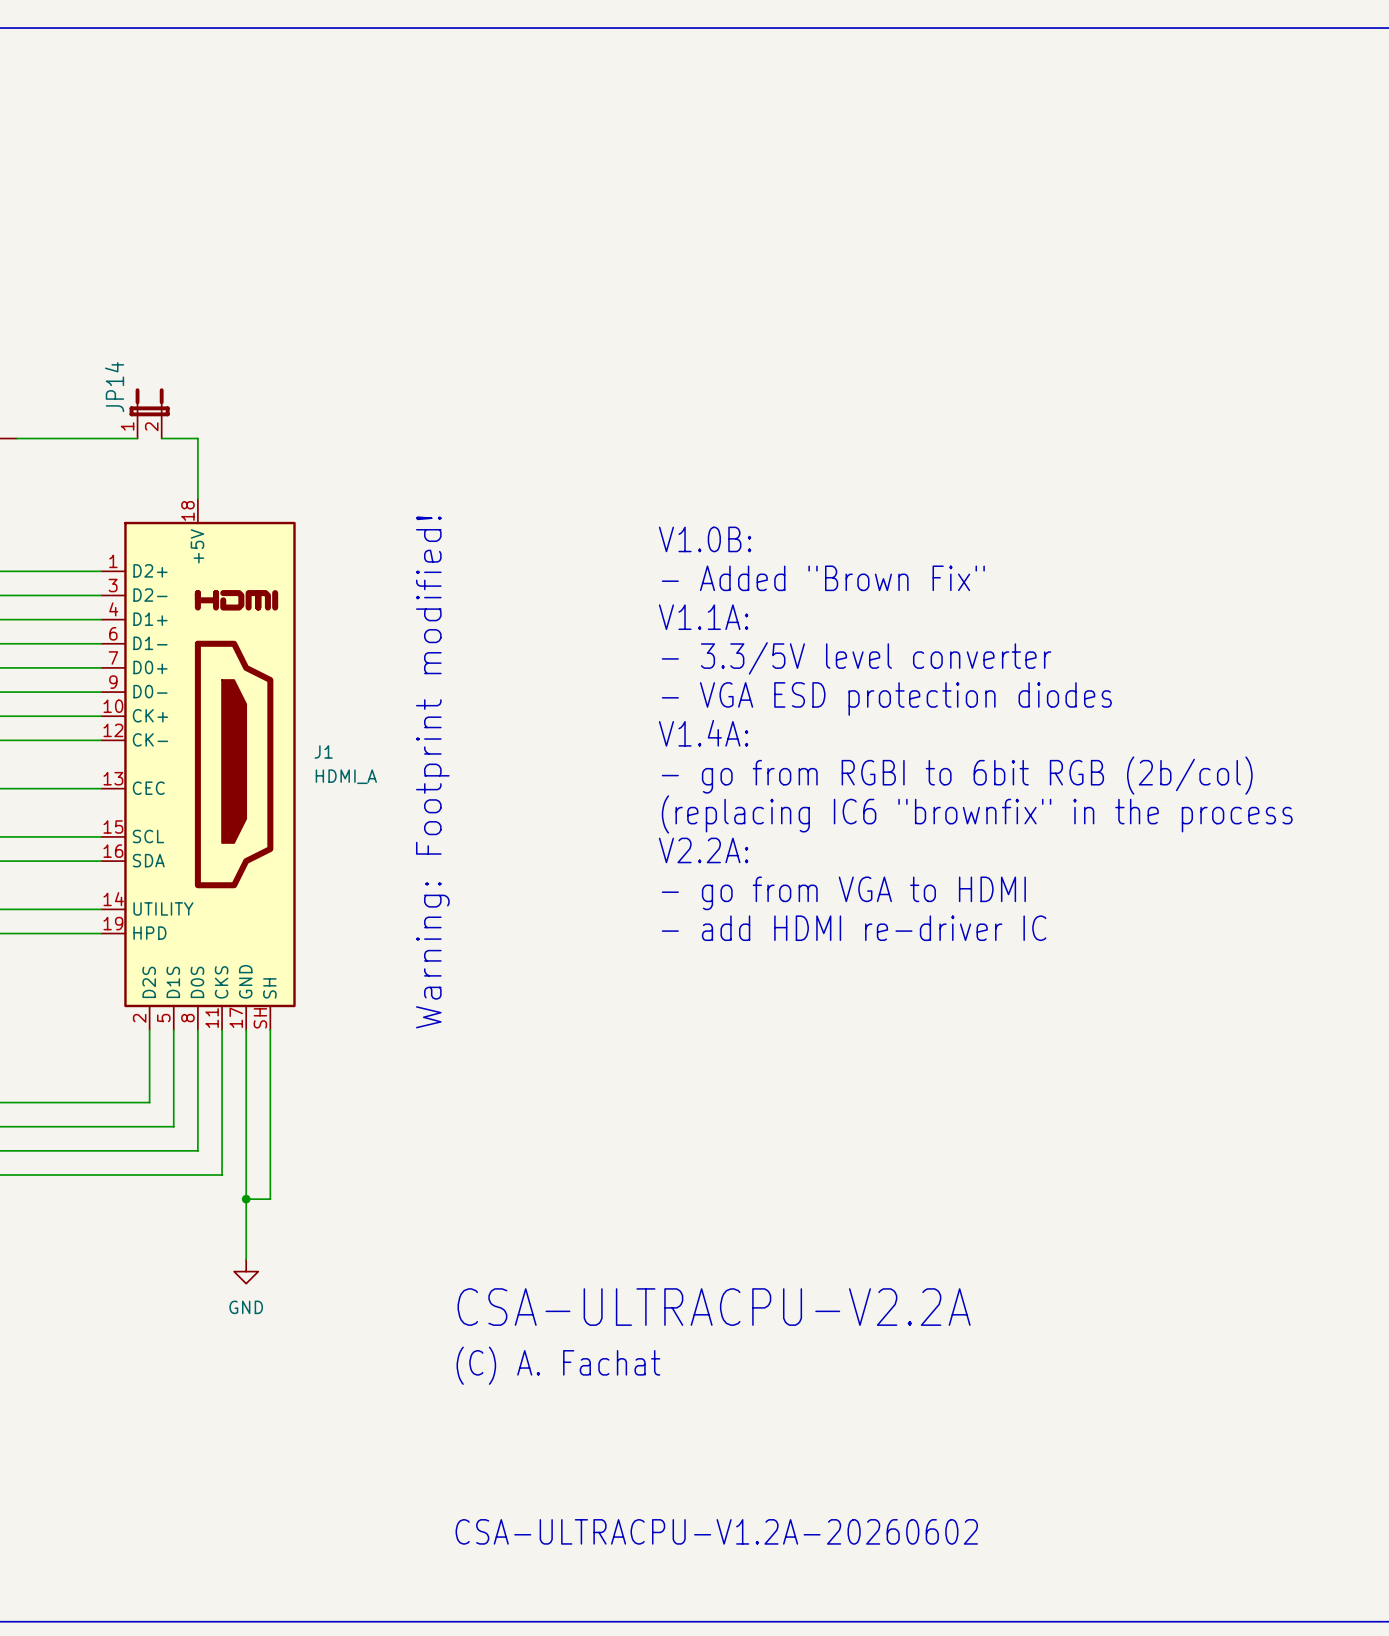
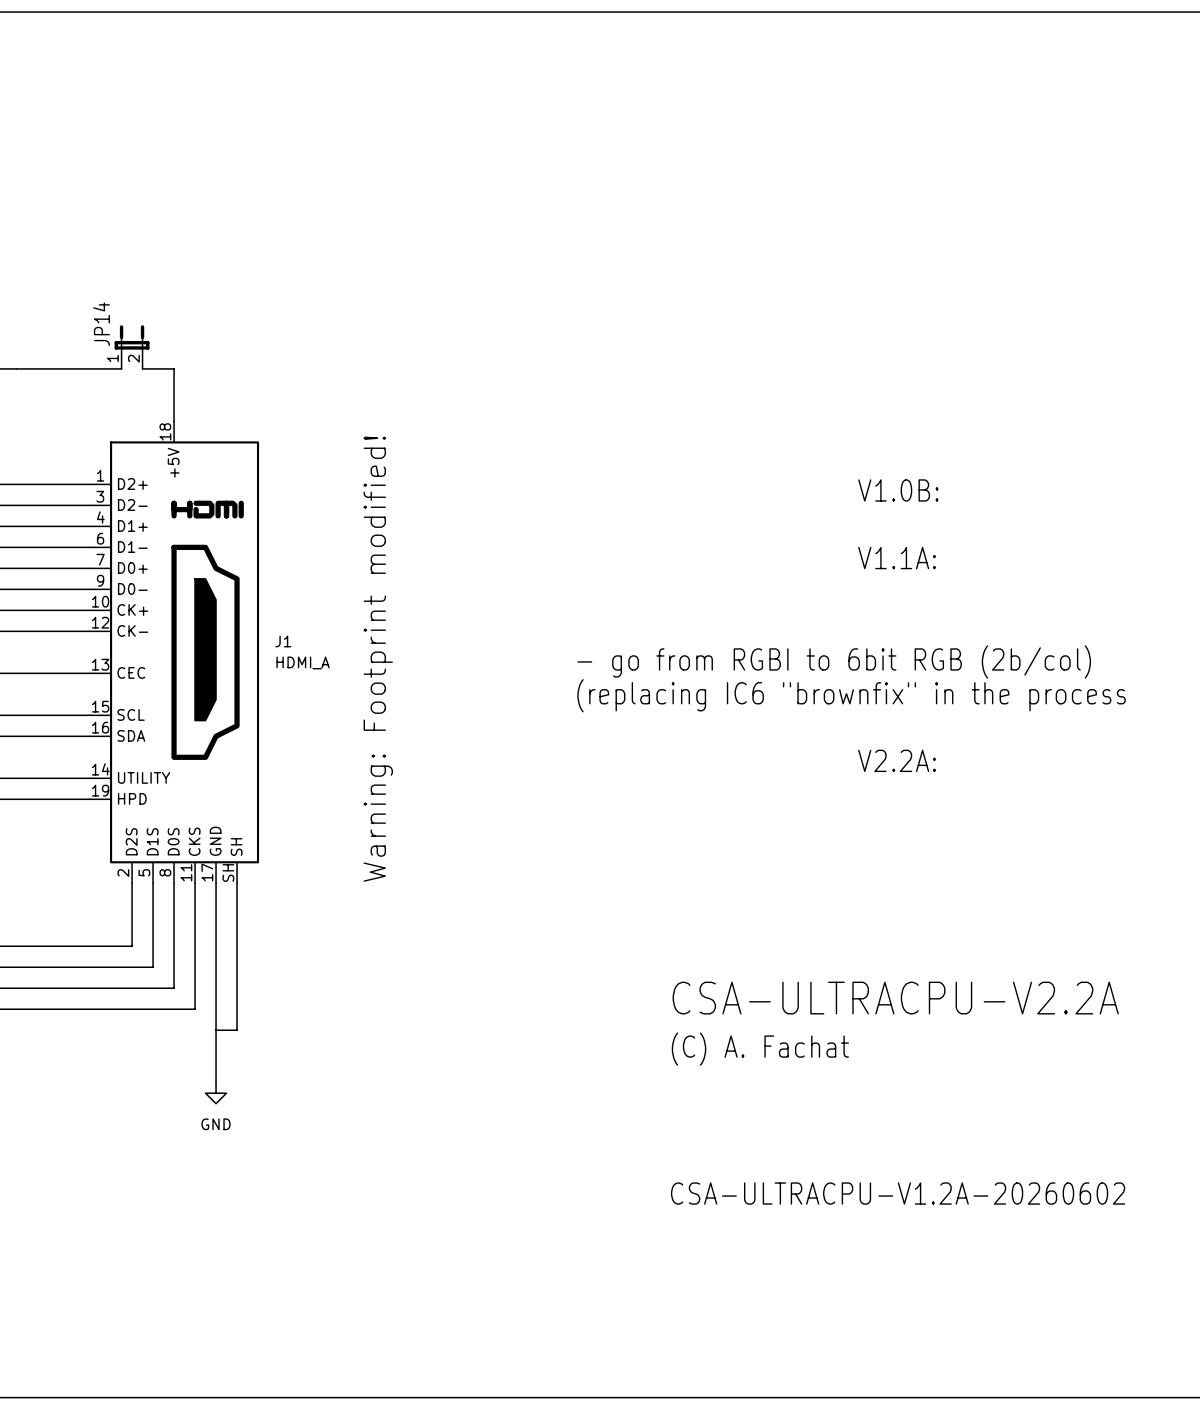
text: V1.0B: (705, 539) -> none
text: - Added "Brown Fix" (823, 578) -> none
text: none -> V1.0B: (898, 490)
text: V1.1A: (703, 617) -> none
text: none -> V1.1A: (897, 558)
text: - 3.3/5V level converter (856, 658) -> none
text: - VGA ESD protection diodes (886, 698) -> none
text: V1.4A: (703, 733) -> none
text: V2.2A: (703, 850) -> none
text: none -> V2.2A: (897, 760)
text: - go from VGA to HDMI (843, 893) -> none
text: - add HDMI re-driver IC (854, 928) -> none
text: none -> CSA-ULTRACPU-V2.2A (895, 998)
junction: (246, 1199) -> none
text: none -> (C) A. Fachat (760, 1049)
text: CSA-ULTRACPU-V2.2A (714, 1307) -> none
text: (C) A. Fachat (558, 1365) -> none
text: none -> CSA-ULTRACPU-V1.2A-20260602 (898, 1193)
text: CSA-ULTRACPU-V1.2A-20260602 (716, 1531) -> none

